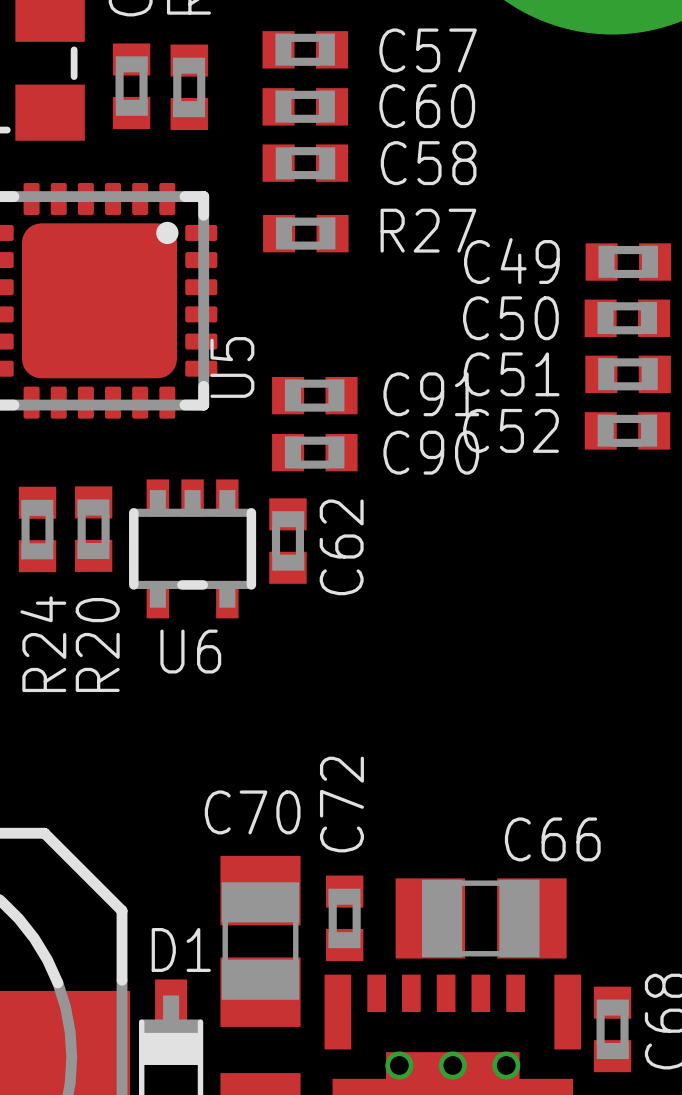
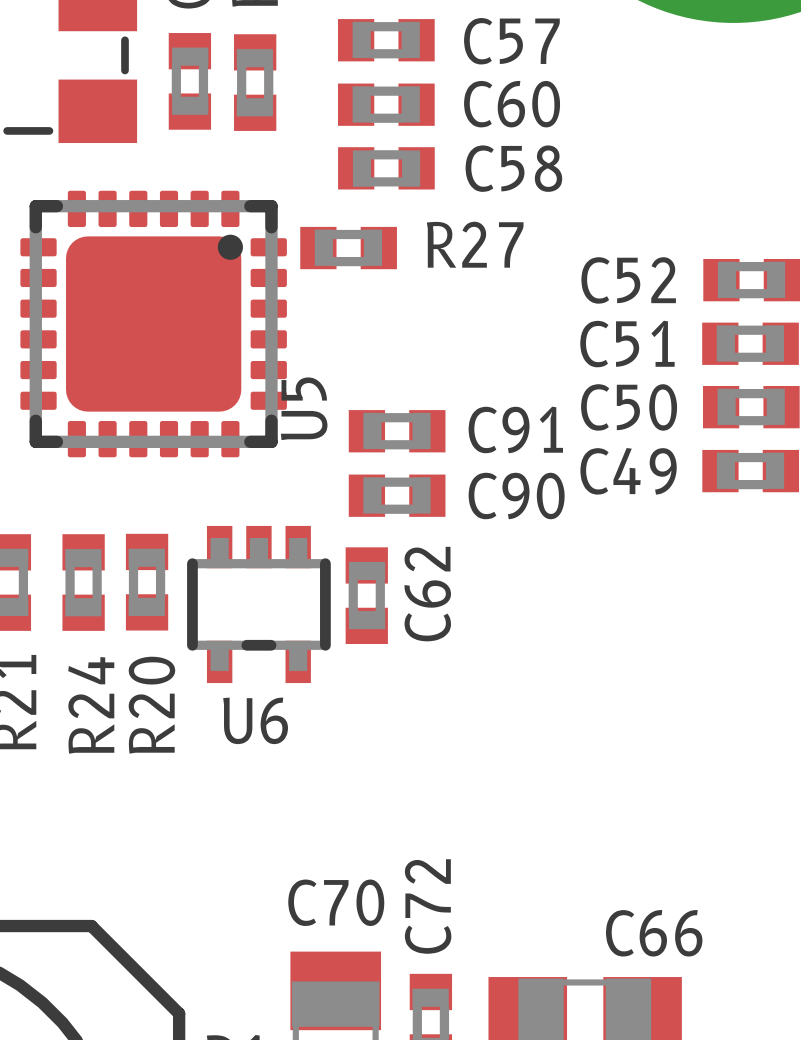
R27 position: (305, 233) -> (348, 248)
C49 name: C49 (511, 261) -> C52 (628, 280)
C50 name: C50 (510, 318) -> C51 (627, 344)
C51 name: C51 (511, 374) -> C50 (629, 407)
C52 name: C52 (511, 430) -> C49 (628, 471)

